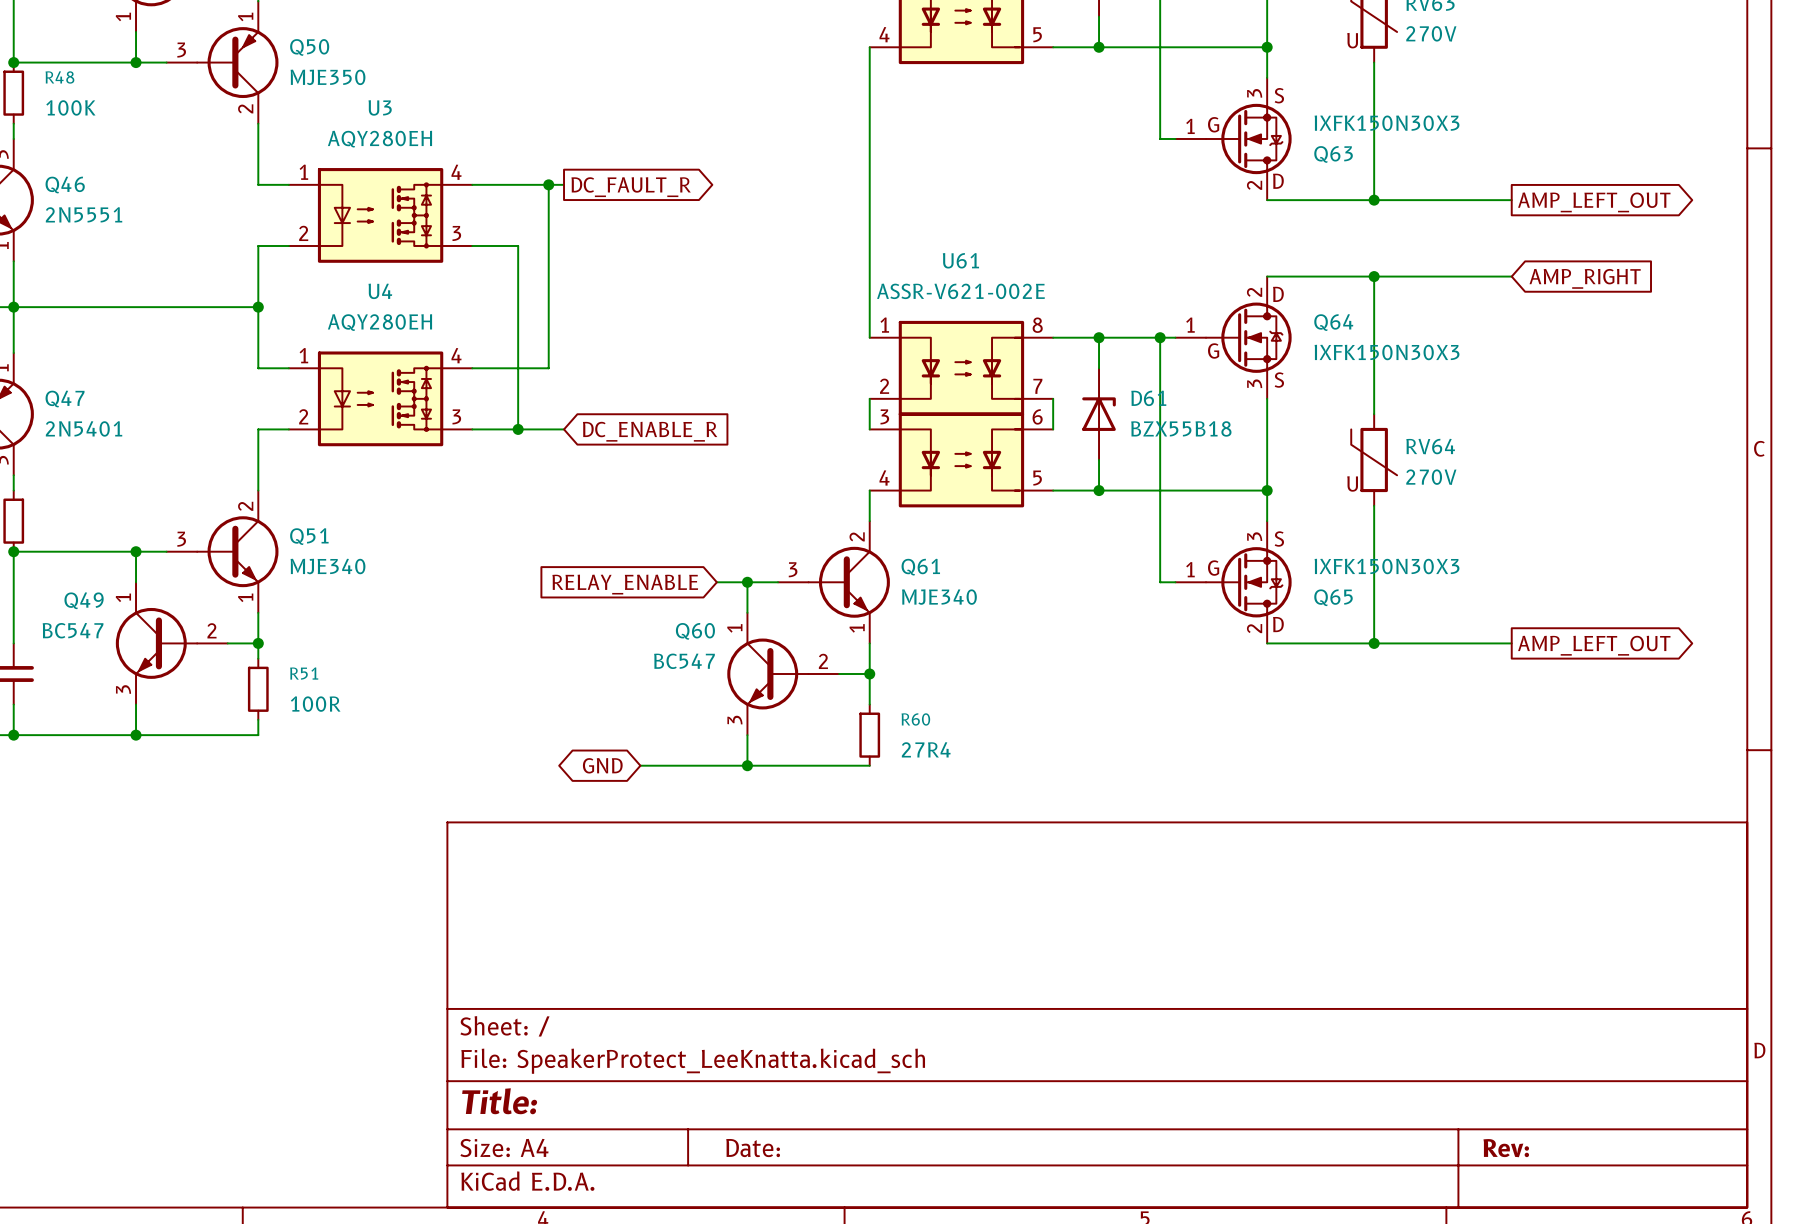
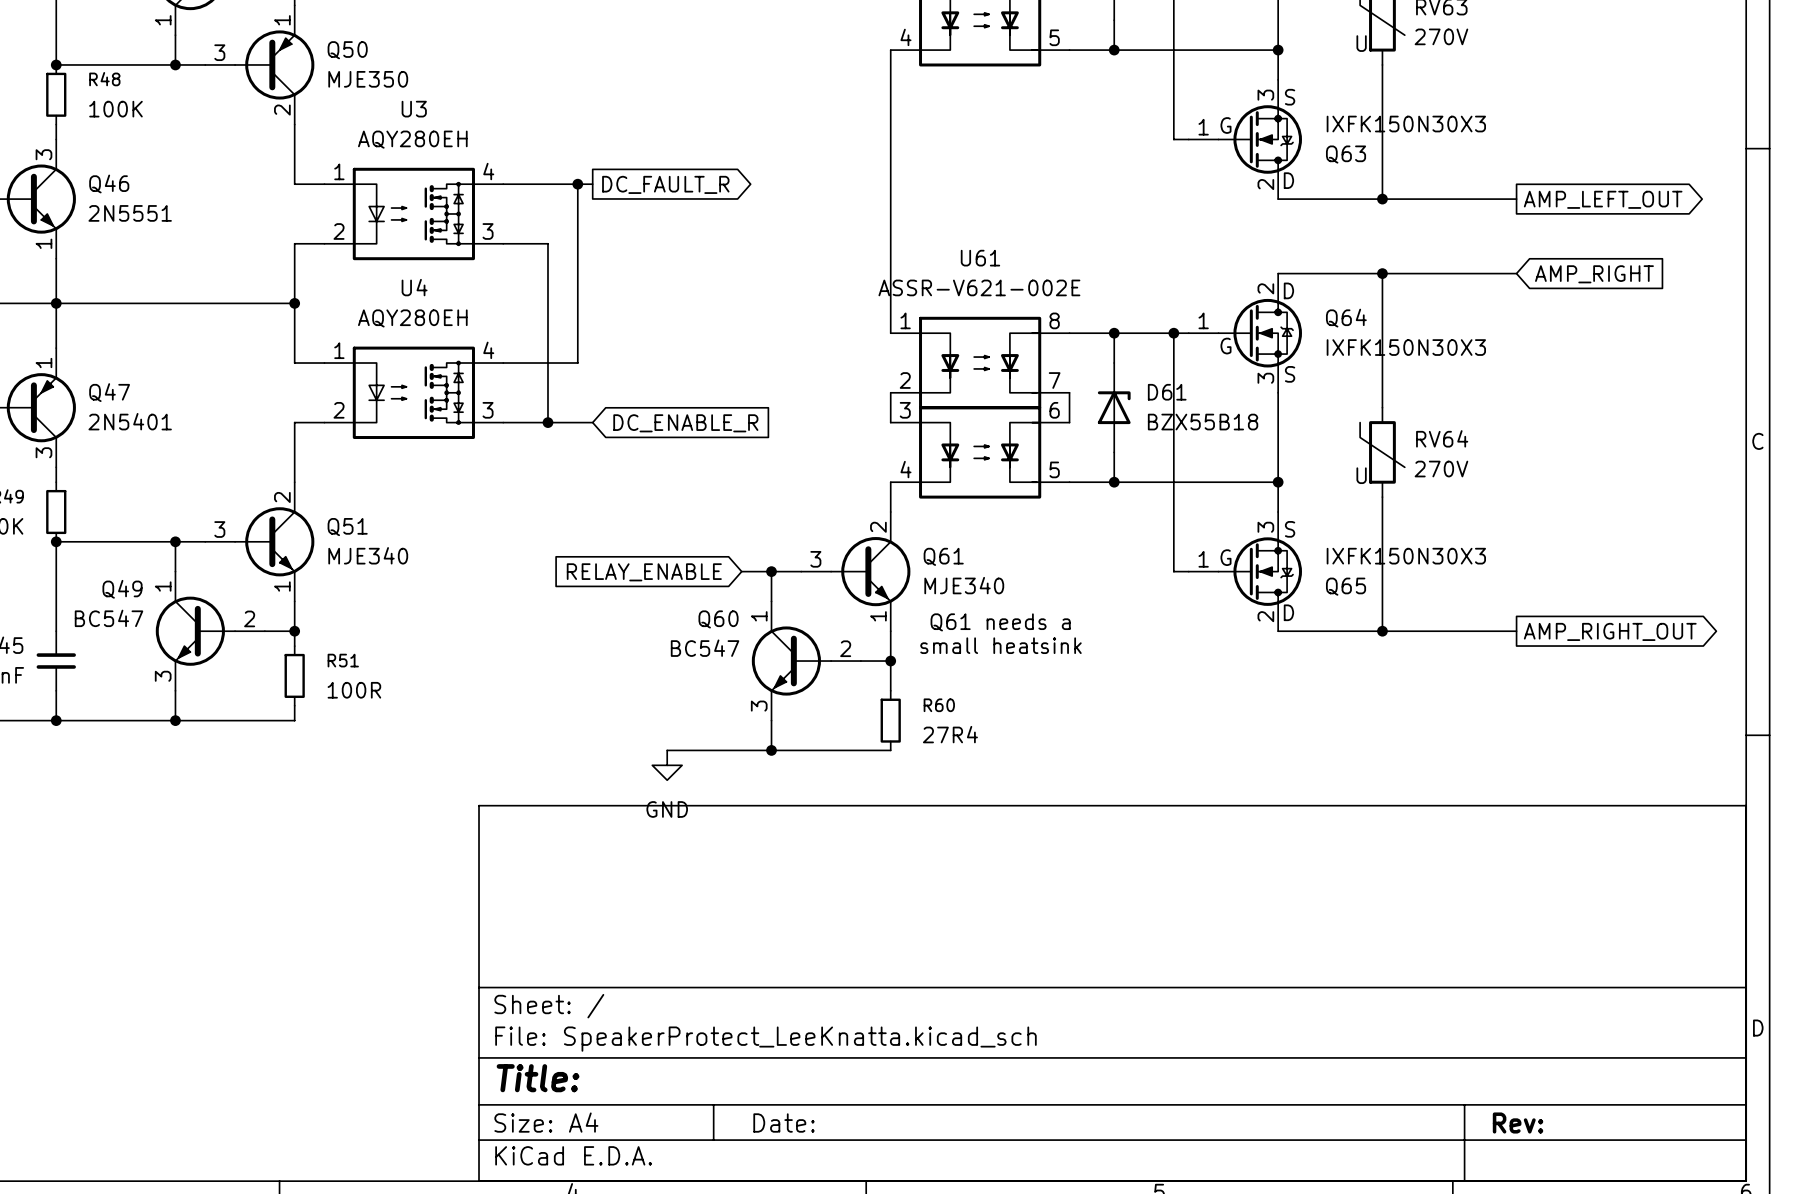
text: none -> Q61 needs a (1000, 622)
global label: AMP_LEFT_OUT (1594, 645) -> AMP_RIGHT_OUT (1610, 631)
text: none -> small heatsink (1000, 645)
global label: GND (602, 765) -> none
power symbol: none -> GND (667, 765)

